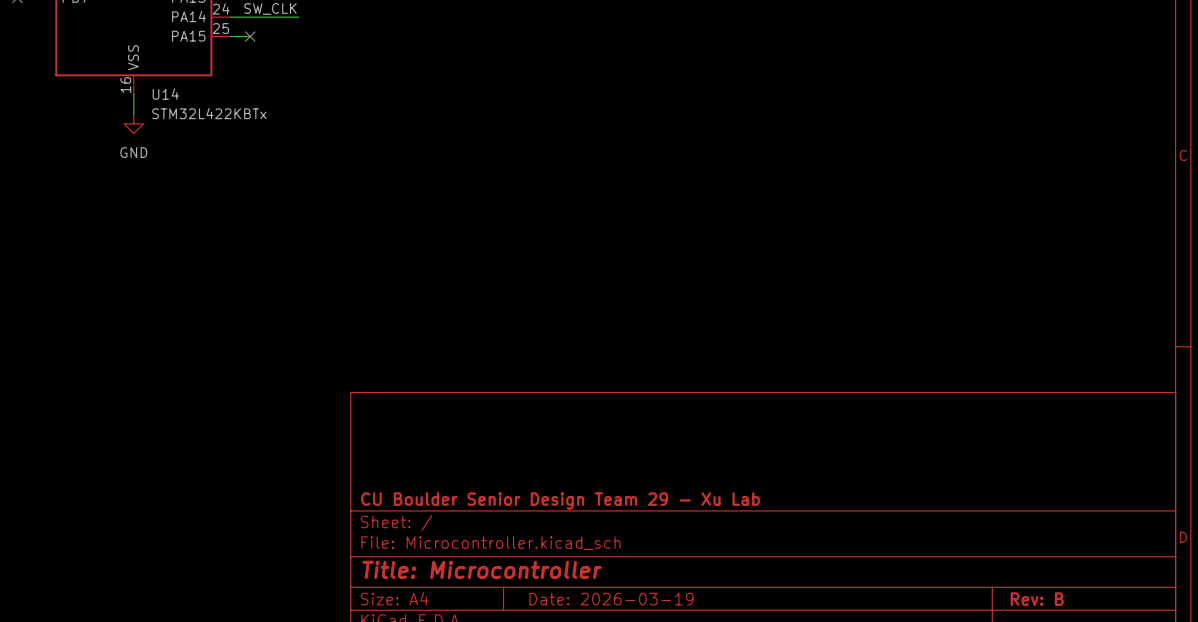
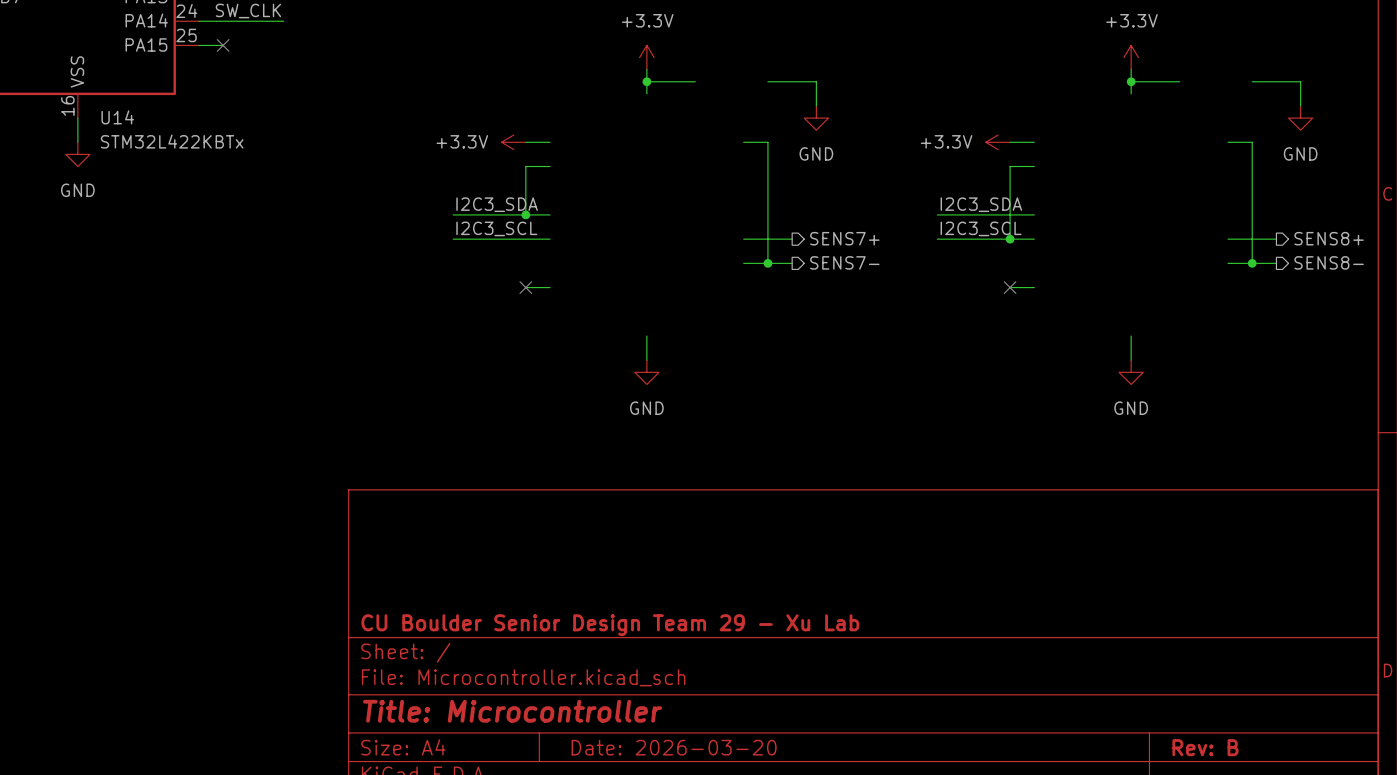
power symbol: none -> +3.3V (646, 57)
power symbol: none -> +3.3V (1131, 57)
wire: none -> (646, 69) (646, 93)
wire: none -> (1131, 69) (1131, 93)
wire: none -> (646, 81) (695, 81)
junction: none -> (646, 81)
wire: none -> (767, 81) (816, 81) (816, 105)
wire: none -> (1131, 81) (1179, 81)
junction: none -> (1131, 81)
wire: none -> (1252, 81) (1300, 81) (1300, 105)
power symbol: none -> GND (816, 118)
power symbol: none -> GND (1300, 118)
power symbol: none -> +3.3V (513, 142)
wire: none -> (525, 142) (550, 142)
wire: none -> (743, 142) (767, 142) (767, 263)
power symbol: none -> +3.3V (997, 142)
wire: none -> (1010, 142) (1034, 142)
wire: none -> (1228, 142) (1252, 142) (1252, 263)
wire: none -> (550, 166) (525, 166) (525, 214)
wire: none -> (1034, 166) (1010, 166) (1010, 239)
label: none -> I2C3_SDA (497, 204)
label: none -> I2C3_SDA (981, 204)
wire: none -> (453, 214) (550, 214)
junction: none -> (525, 214)
wire: none -> (937, 214) (1034, 214)
label: none -> I2C3_SCL (496, 228)
label: none -> I2C3_SCL (981, 228)
wire: none -> (453, 239) (550, 239)
wire: none -> (743, 239) (792, 239)
hierarchical label: none -> SENS7+ (844, 238)
wire: none -> (937, 239) (1034, 239)
junction: none -> (1010, 239)
wire: none -> (1228, 239) (1276, 239)
hierarchical label: none -> SENS8+ (1329, 238)
hierarchical label: none -> SENS7- (844, 262)
hierarchical label: none -> SENS8- (1329, 262)
wire: none -> (743, 263) (792, 263)
junction: none -> (767, 263)
wire: none -> (1228, 263) (1276, 263)
junction: none -> (1252, 263)
wire: none -> (525, 287) (550, 287)
no-connect mark: none -> (525, 287)
wire: none -> (1010, 287) (1034, 287)
no-connect mark: none -> (1010, 287)
wire: none -> (646, 336) (646, 360)
wire: none -> (1131, 336) (1131, 360)
power symbol: none -> GND (646, 372)
power symbol: none -> GND (1131, 372)
title block: Date: 2026-03-19 (611, 599) -> Date: 2026-03-20 (674, 747)

